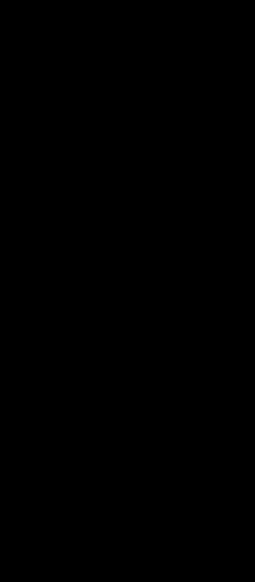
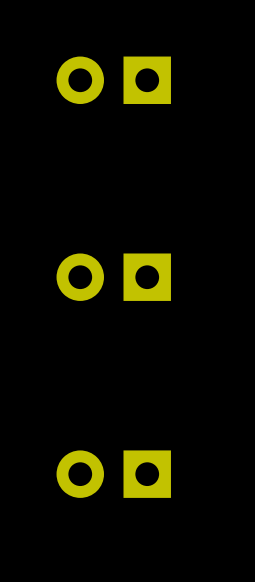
part: none -> (113, 80)
part: none -> (113, 277)
part: none -> (113, 474)

